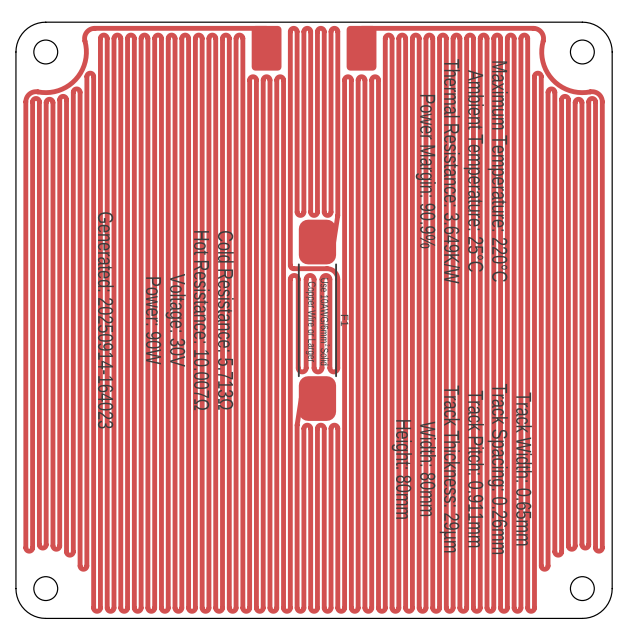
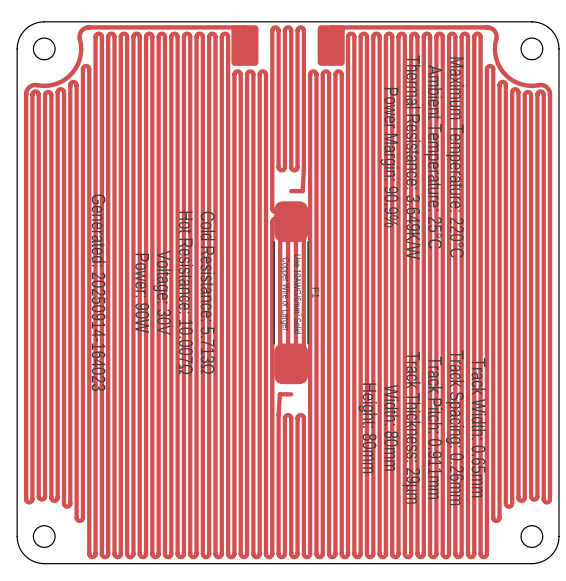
track: none -> (291, 191) (302, 191) (303, 30) (300, 27) (297, 30) (297, 167) (294, 170) (291, 167) (291, 30) (288, 27) (284, 30) (284, 167) (281, 170) (278, 167) (278, 30) (275, 27) (272, 30) (272, 209) (275, 211) (296, 212) (303, 219) (303, 369) (300, 373) (295, 369) (295, 222) (292, 218) (288, 221) (288, 255)
track: (317, 242) (333, 242) (337, 215) (337, 31) (334, 28) (331, 31) (331, 212) (327, 215) (324, 212) (324, 31) (321, 28) (317, 31) (317, 212) (314, 215) (310, 212) (310, 31) (307, 28) (304, 30) (303, 212) (300, 215) (297, 212) (297, 31) (293, 28) (290, 31) (290, 265) (293, 268) (329, 269) (335, 272) (337, 279) (337, 368) (333, 371) (329, 368) (329, 279) (325, 275) (321, 279) (321, 368) (318, 371) (314, 367) -> none
track: (314, 279) (310, 275) (306, 278) (306, 367) (302, 371) (298, 367) (298, 278) (294, 275) (290, 278) (290, 607) (286, 611) (283, 607) (283, 80) (279, 76) (276, 80) (276, 607) (272, 611) (269, 607) (269, 80) (265, 76) (263, 80) (263, 607) (259, 611) (256, 607) (256, 80) (252, 76) (249, 80) (249, 607) (245, 611) (242, 607) (242, 38) (238, 35) (236, 38) (236, 607) (231, 611) (229, 607) (229, 38) (224, 35) (222, 38) (222, 607) (218, 611) (215, 607) (215, 38) (211, 35) (208, 38) (208, 607) (204, 611) (202, 607) (202, 38) (197, 35) (195, 38) (195, 607) (190, 611) (188, 607) (188, 38) (187, 35) (183, 35) (181, 38) (181, 607) (177, 611) (175, 607) (175, 38) (173, 35) (170, 35) (168, 38) (168, 607) (163, 611) (161, 607) (161, 38) (159, 35) (156, 35) (154, 607) (153, 610) (149, 610) (147, 607) (147, 38) (145, 35) (142, 35) (141, 607) (139, 610) (136, 610) (134, 607) (134, 38) (132, 35) (128, 35) (127, 607) (125, 610) (122, 610) (120, 607) (120, 38) (118, 35) (115, 35) (113, 607) (112, 610) (108, 610) (107, 607) (107, 38) (105, 35) (101, 35) (99, 609) (96, 611) (93, 607) (93, 76) (90, 73) (86, 76) (86, 566) (83, 569) (80, 565) (80, 92) (77, 88) (73, 92) (73, 552) (69, 555) (66, 551) (66, 99) (63, 96) (59, 99) (59, 546) (56, 549) (52, 545) (52, 102) (49, 99) (46, 102) (46, 544) (42, 548) (39, 544) (39, 101) (35, 98) (32, 101) (32, 547) (29, 551) (25, 547) -> (288, 336) (288, 370) (283, 373) (280, 369) (280, 222) (275, 218) (272, 222) (272, 553) (268, 557) (265, 553) (265, 74) (262, 71) (259, 74) (259, 553) (256, 557) (253, 553) (253, 74) (249, 71) (247, 74) (247, 553) (243, 556) (240, 553) (240, 74) (237, 71) (234, 74) (234, 553) (230, 557) (228, 553) (228, 36) (224, 33) (221, 36) (221, 553) (217, 556) (215, 553) (215, 36) (211, 33) (209, 36) (209, 553) (204, 556) (202, 553) (202, 36) (198, 33) (196, 36) (196, 553) (192, 556) (190, 553) (190, 36) (185, 33) (183, 36) (183, 553) (179, 556) (177, 553) (177, 36) (173, 33) (171, 36) (171, 553) (169, 556) (166, 556) (164, 553) (164, 36) (160, 33) (158, 36) (158, 553) (157, 556) (153, 556) (152, 553) (152, 36) (150, 34) (147, 34) (146, 36) (146, 553) (144, 556) (141, 556) (139, 553) (139, 36) (138, 34) (135, 34) (133, 36) (133, 553) (131, 556) (128, 556) (127, 36) (125, 34) (122, 34) (120, 36) (120, 553) (119, 556) (115, 556) (114, 36) (112, 34) (109, 34) (108, 36) (108, 553) (106, 556) (103, 556) (101, 36) (100, 34) (96, 34) (94, 555) (91, 556) (89, 553) (89, 69) (86, 66) (82, 69) (82, 518) (79, 520) (76, 517) (76, 85) (73, 81) (70, 85) (70, 503) (66, 506) (64, 503) (64, 92) (61, 89) (57, 92) (57, 498) (54, 500) (51, 497) (51, 95) (48, 92) (45, 95) (45, 496) (41, 499) (38, 496) (38, 94) (35, 91) (32, 94) (32, 499) (29, 502) (26, 499)
track: (317, 398) (301, 398) (297, 425) (297, 608) (300, 611) (303, 607) (303, 428) (307, 425) (310, 428) (310, 607) (313, 611) (317, 608) (317, 428) (320, 425) (324, 428) (324, 607) (327, 611) (330, 608) (331, 428) (334, 425) (337, 428) (337, 607) (341, 611) (344, 607) (344, 80) (348, 76) (351, 80) (351, 607) (355, 611) (358, 607) (358, 80) (361, 76) (364, 80) (364, 607) (369, 611) (371, 607) (371, 80) (375, 76) (378, 80) (378, 607) (382, 611) (385, 607) (385, 38) (389, 35) (392, 38) (392, 607) (396, 611) (398, 607) (398, 38) (403, 35) (405, 38) (405, 607) (410, 611) (412, 607) (412, 38) (416, 35) (419, 38) (419, 607) (420, 610) (424, 610) (425, 607) (425, 38) (430, 35) (432, 38) (432, 607) (434, 610) (437, 610) (439, 607) (439, 38) (444, 35) (446, 38) (446, 607) (448, 610) (451, 610) (453, 607) (453, 38) (457, 35) (459, 38) (459, 607) (461, 610) (465, 610) (466, 38) (471, 35) (473, 38) (473, 607) (475, 610) (478, 610) (480, 38) (481, 35) (485, 35) (487, 38) (487, 607) (488, 610) (492, 610) (493, 38) (495, 35) (498, 35) (500, 38) (500, 607) (502, 610) (506, 610) (507, 38) (509, 35) (512, 35) (514, 38) (514, 607) (516, 611) (519, 610) (520, 38) (522, 35) (525, 35) (527, 38) (528, 609) (532, 611) (534, 607) (534, 76) (537, 73) (541, 76) (541, 567) (545, 569) (548, 565) (548, 92) (551, 88) (554, 92) (554, 552) (558, 555) (561, 551) (561, 99) (564, 96) (568, 99) (568, 546) (571, 549) (575, 545) (575, 102) (578, 99) (581, 102) (581, 544) (585, 548) (588, 544) (588, 101) (592, 98) (595, 101) (595, 547) (598, 551) (602, 547) -> (291, 394) (279, 394) (278, 554) (281, 557) (284, 554) (284, 418) (288, 415) (291, 418) (291, 554) (294, 557) (297, 554) (297, 418) (301, 415) (303, 418) (303, 553) (307, 557) (310, 553) (310, 74) (313, 71) (316, 74) (316, 553) (320, 557) (322, 553) (322, 74) (326, 71) (329, 74) (329, 553) (333, 556) (335, 553) (335, 74) (338, 71) (341, 74) (341, 553) (346, 556) (348, 553) (348, 36) (351, 33) (354, 36) (354, 553) (358, 556) (360, 553) (360, 36) (364, 33) (366, 36) (366, 553) (368, 556) (371, 556) (373, 553) (373, 36) (377, 33) (379, 36) (379, 553) (381, 556) (384, 556) (385, 553) (385, 36) (389, 33) (392, 36) (392, 553) (393, 556) (396, 556) (398, 553) (398, 36) (402, 33) (404, 36) (404, 553) (406, 556) (409, 556) (411, 36) (415, 33) (417, 36) (417, 553) (419, 556) (422, 556) (423, 36) (428, 33) (430, 36) (430, 553) (432, 556) (435, 556) (436, 36) (440, 33) (442, 36) (442, 553) (444, 556) (447, 556) (449, 36) (450, 34) (453, 34) (455, 36) (455, 553) (457, 556) (460, 556) (461, 36) (463, 34) (466, 34) (467, 36) (467, 553) (469, 556) (473, 556) (474, 36) (478, 33) (480, 36) (481, 555) (484, 556) (486, 553) (486, 69) (489, 66) (493, 69) (493, 518) (496, 520) (499, 517) (499, 85) (502, 81) (505, 85) (505, 503) (509, 506) (512, 503) (512, 92) (514, 89) (518, 92) (518, 498) (521, 500) (524, 497) (524, 95) (527, 92) (531, 95) (531, 496) (534, 499) (537, 496) (537, 94) (540, 91) (543, 94) (543, 499) (546, 502) (550, 499)

